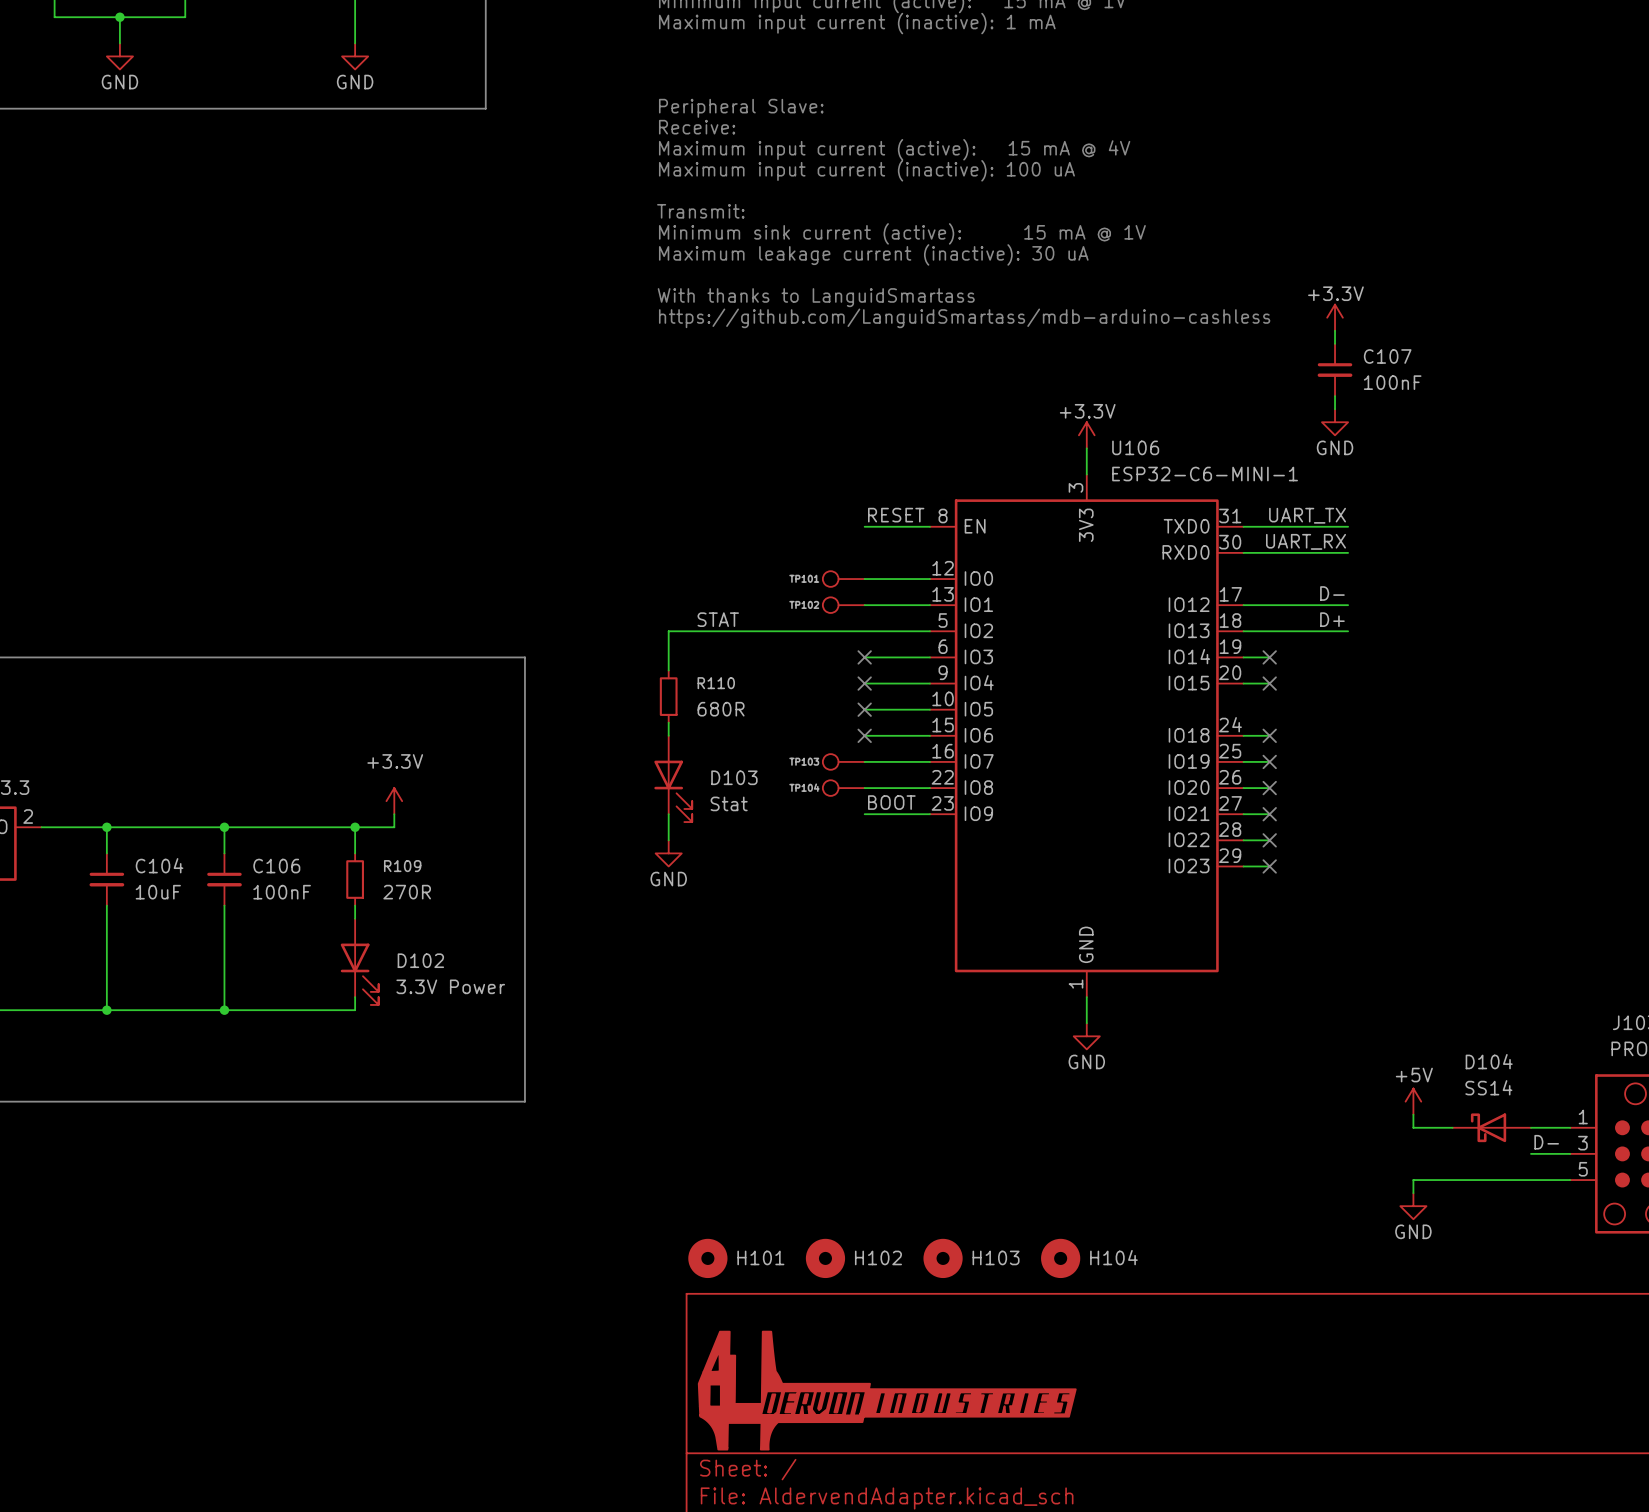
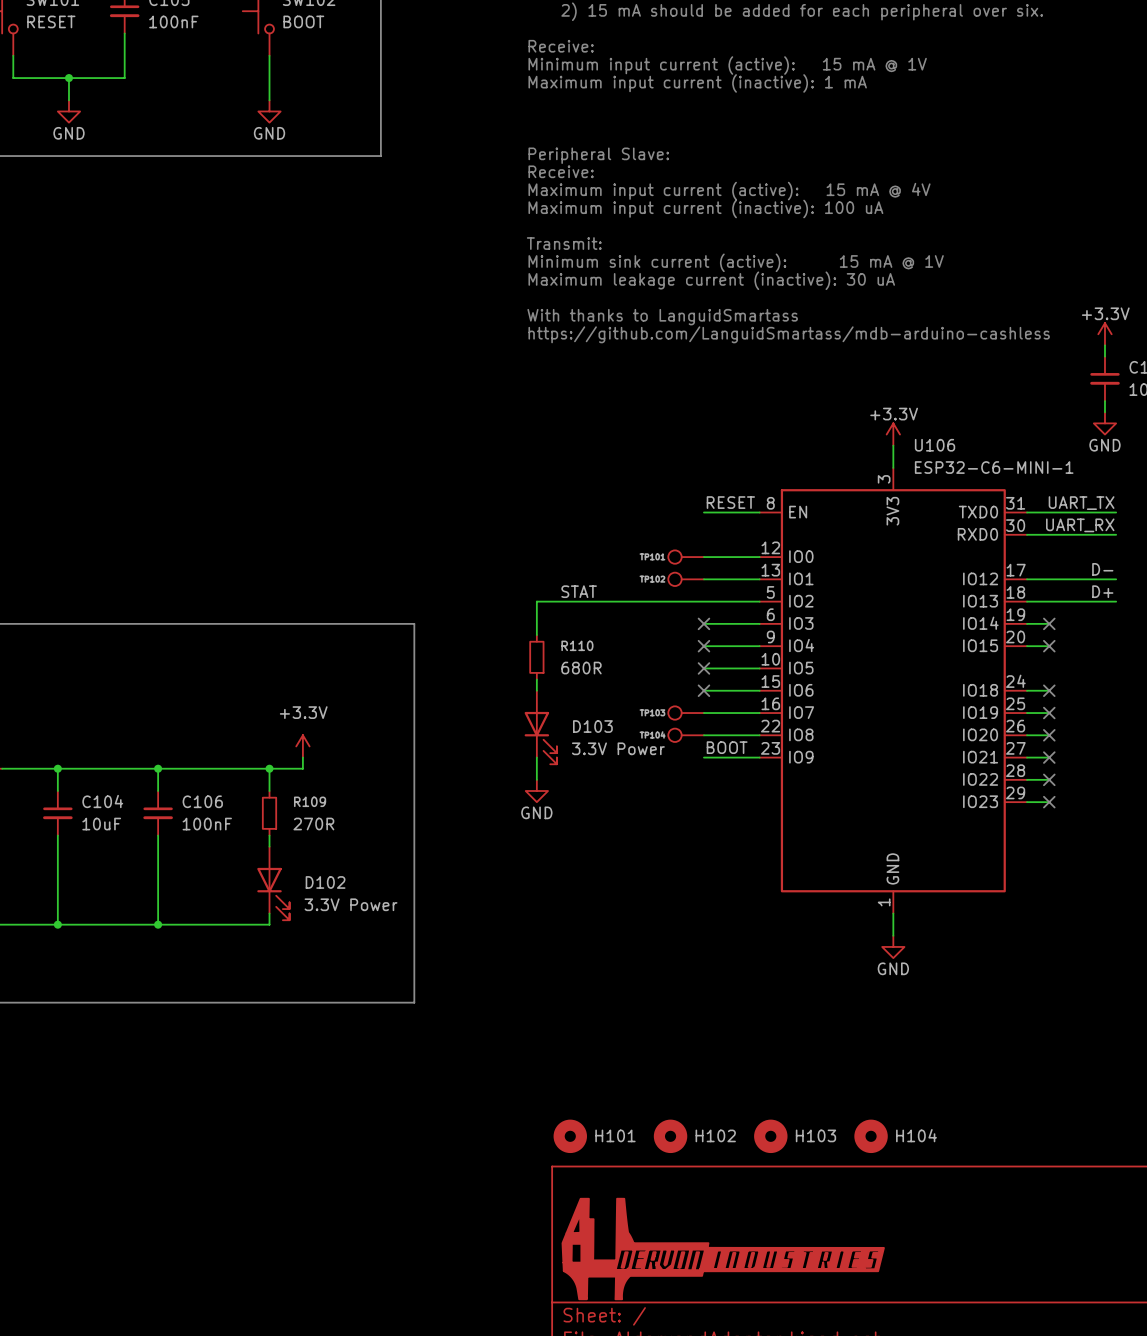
D103 value: Stat (729, 803) -> 3.3V Power (618, 748)

